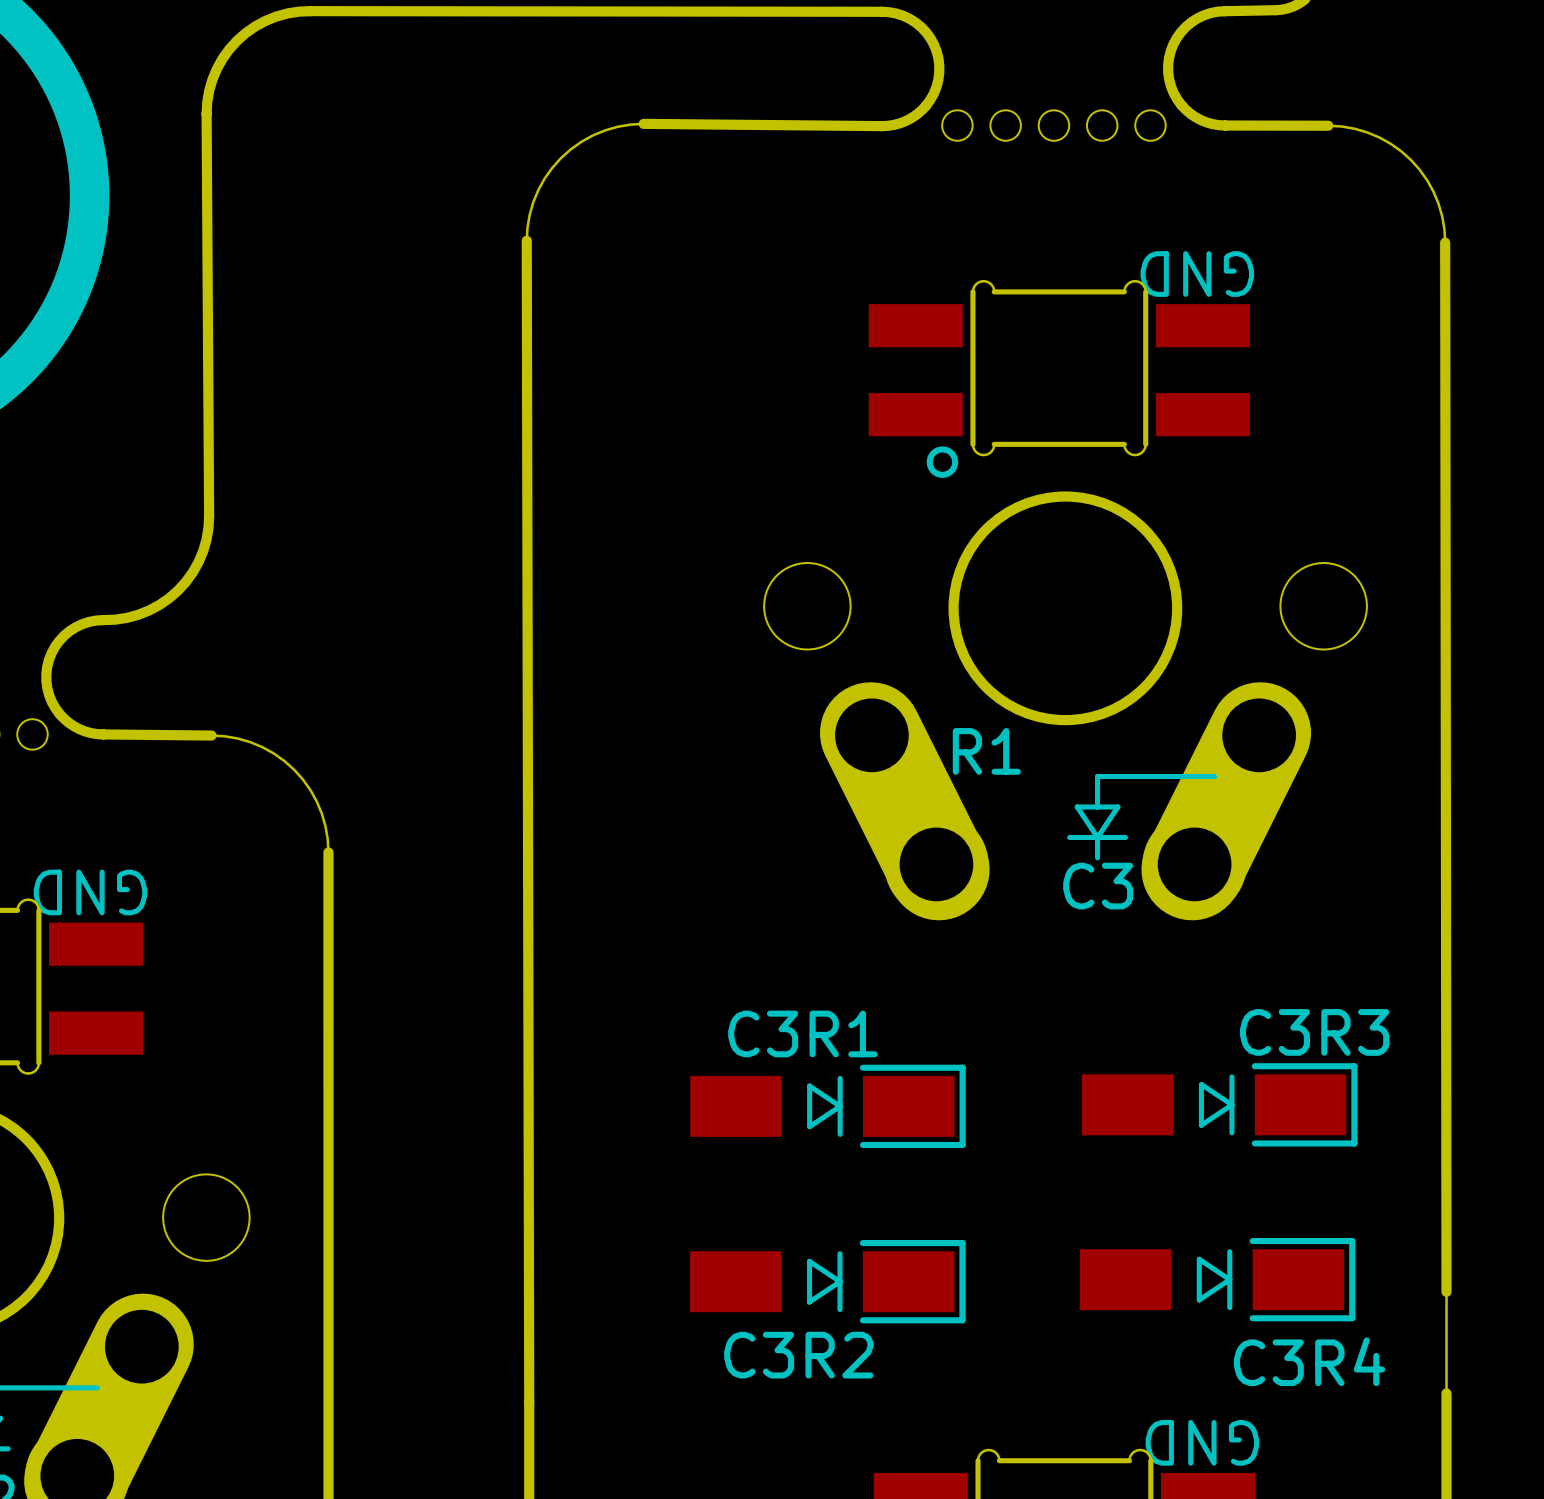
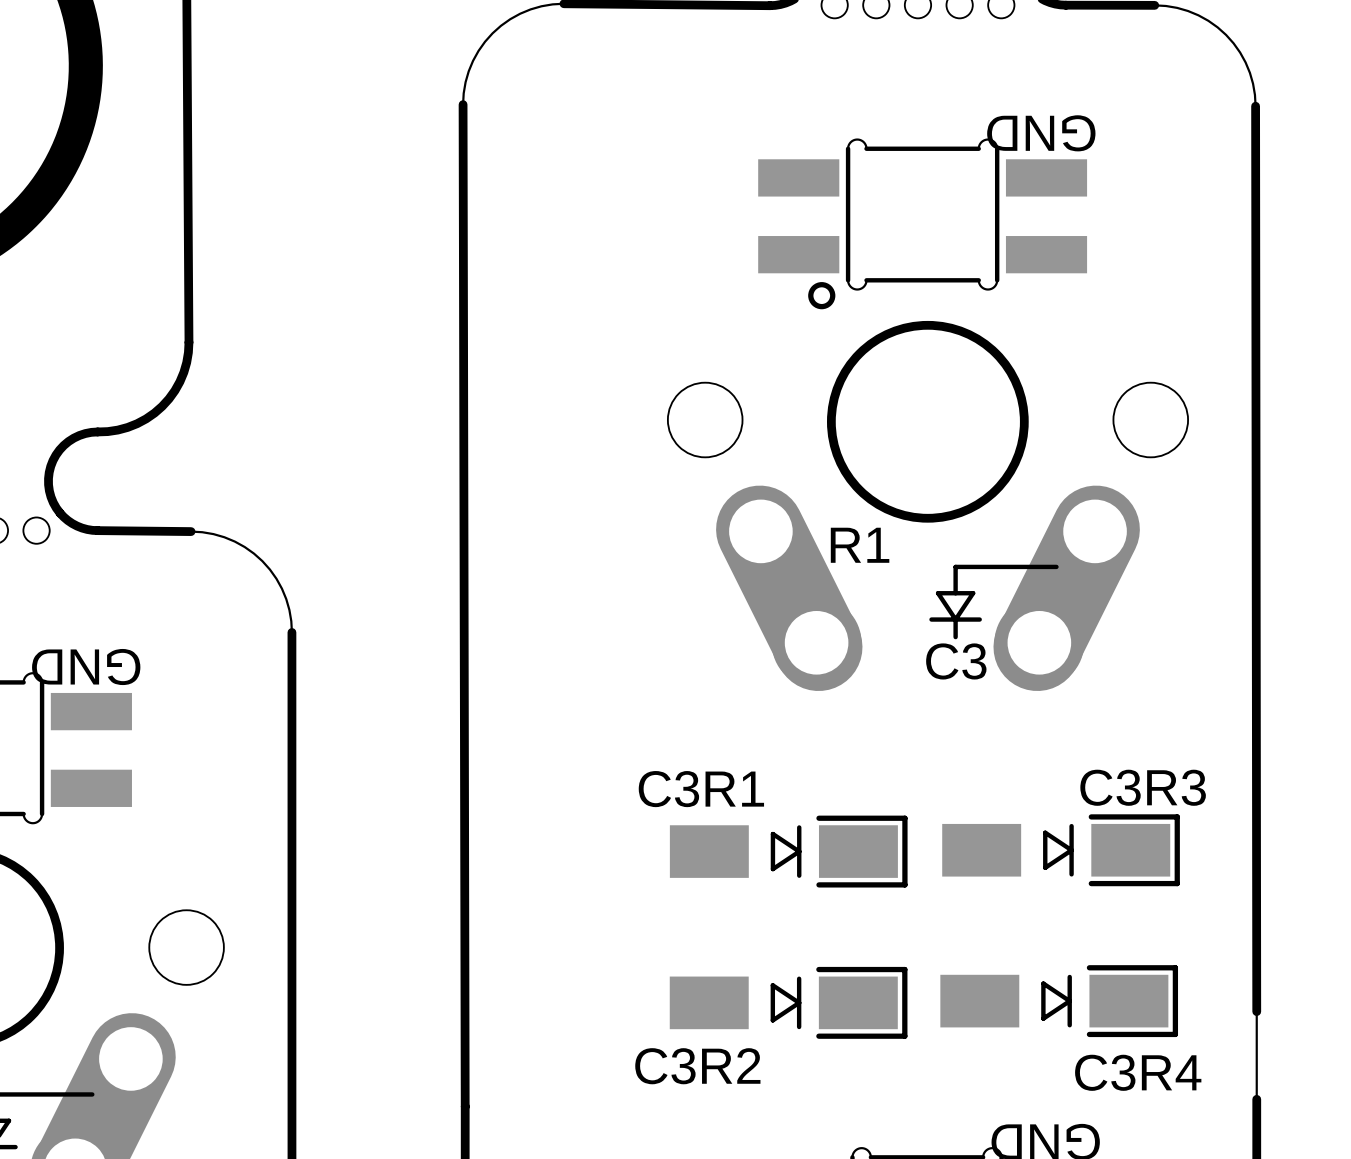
part position: (827, 1106) -> (788, 851)
part position: (827, 1281) -> (788, 1002)

